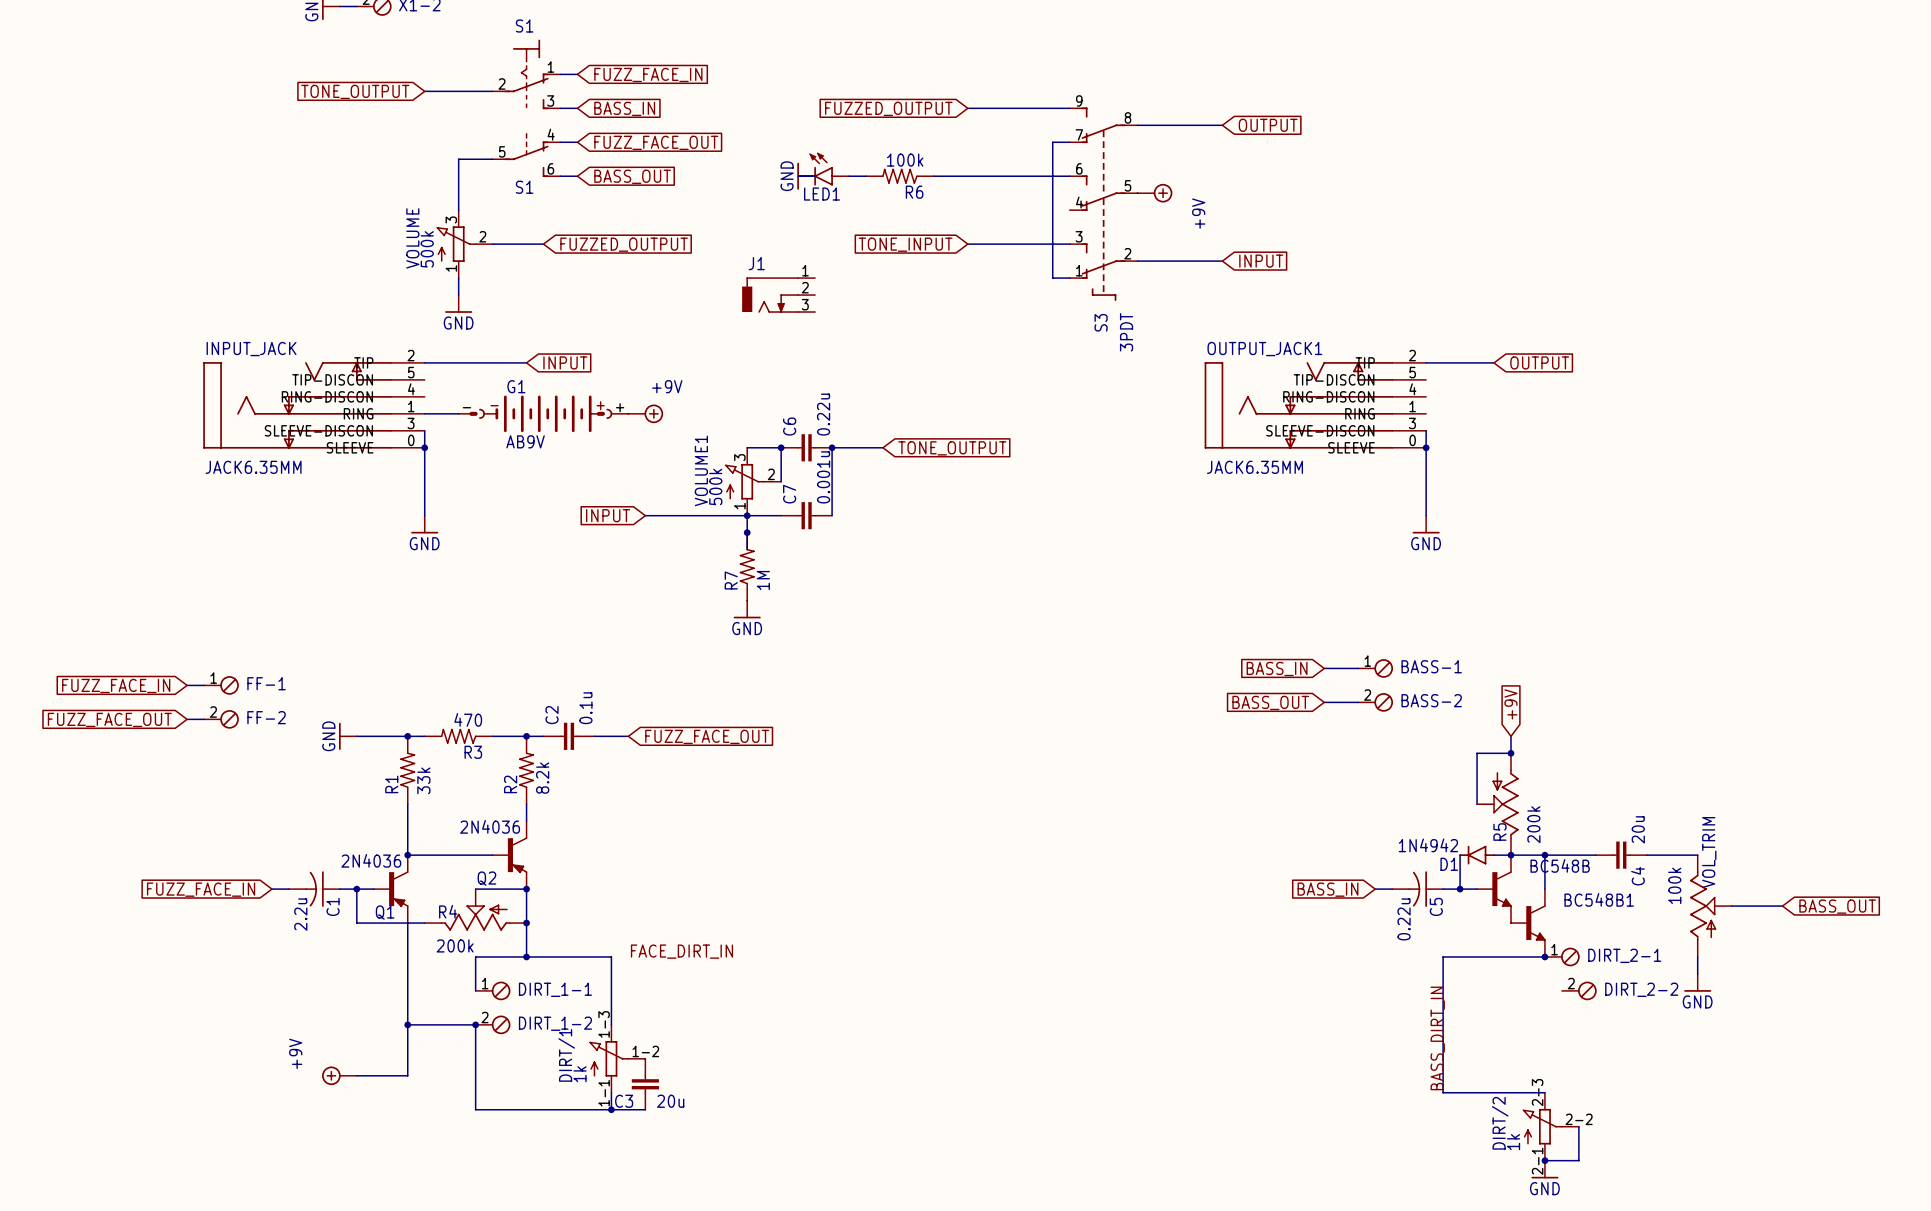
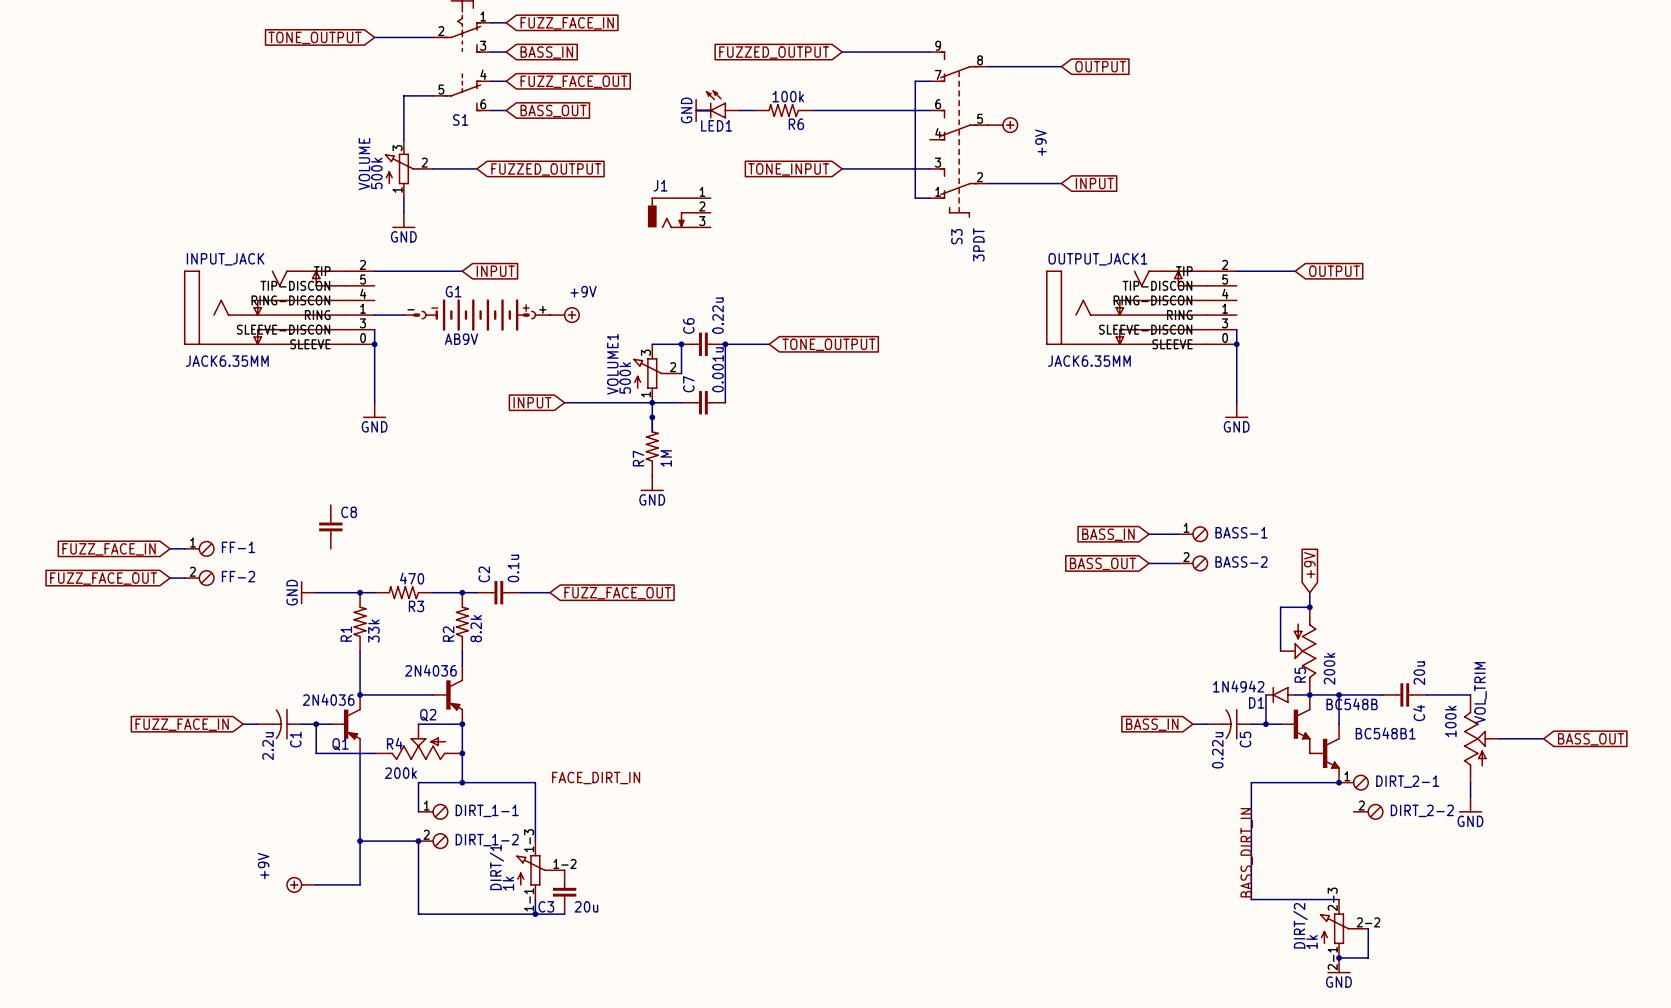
C8: none -> (330, 526)

